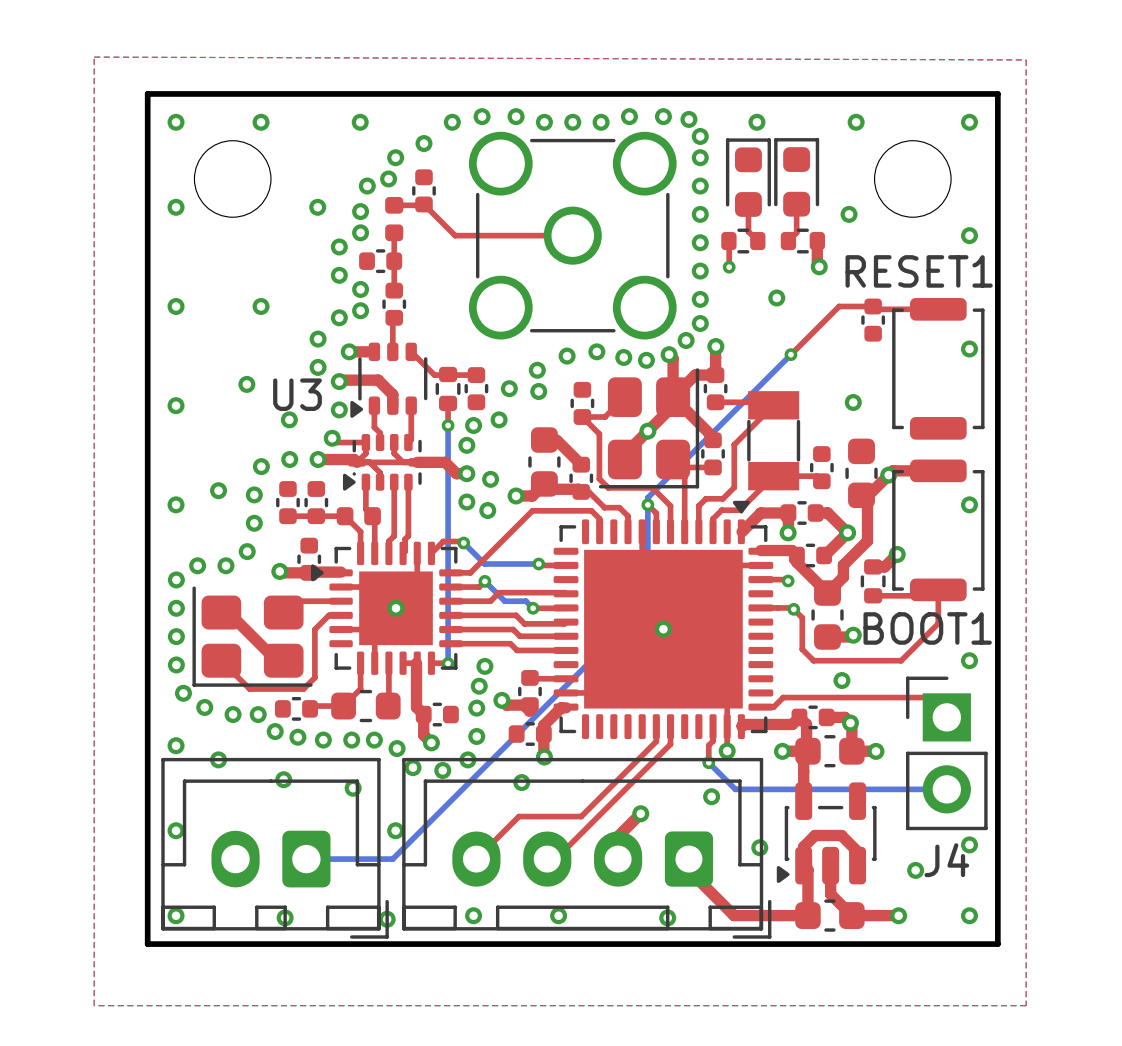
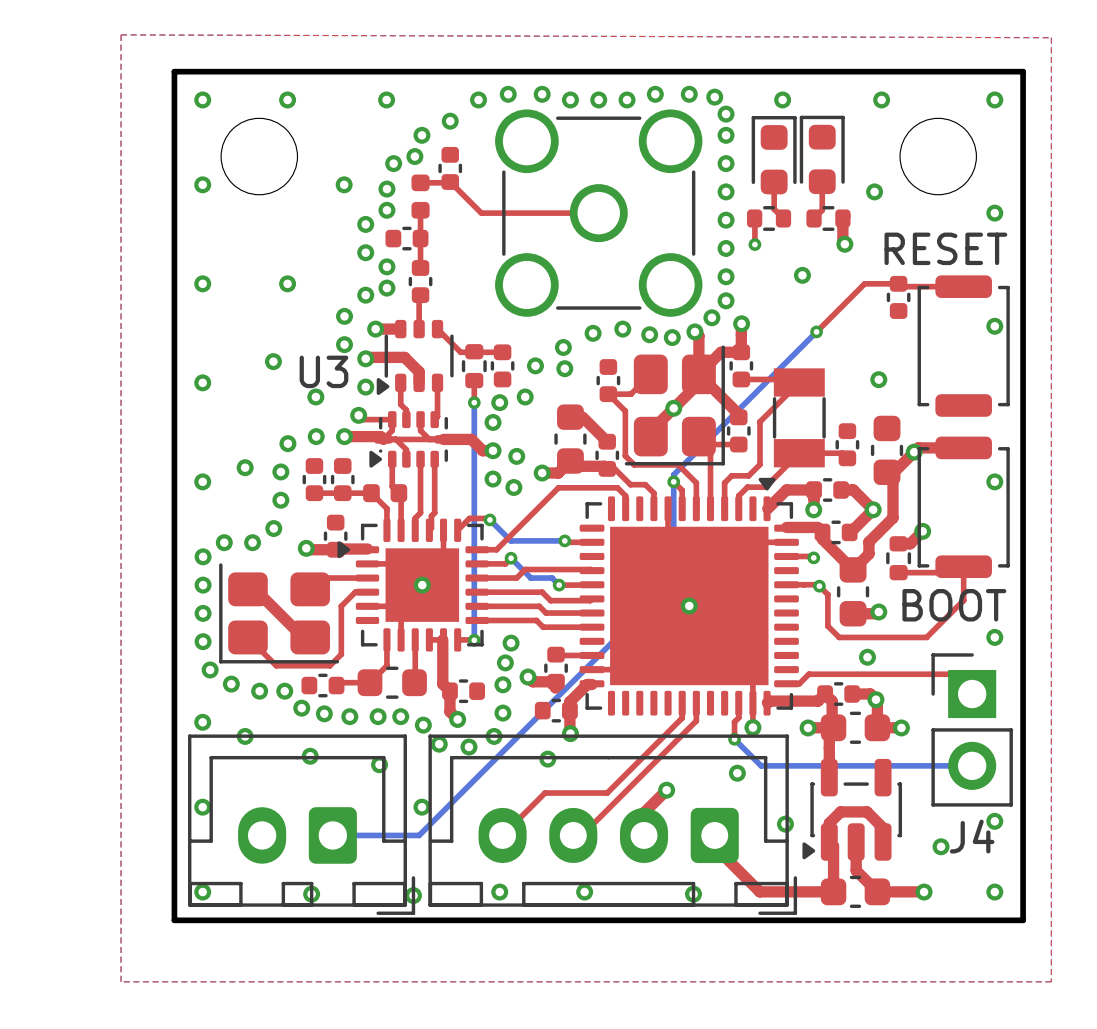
RESET1 name: RESET1 (919, 271) -> RESET (945, 248)
BOOT1 name: BOOT1 (927, 628) -> BOOT (954, 605)

